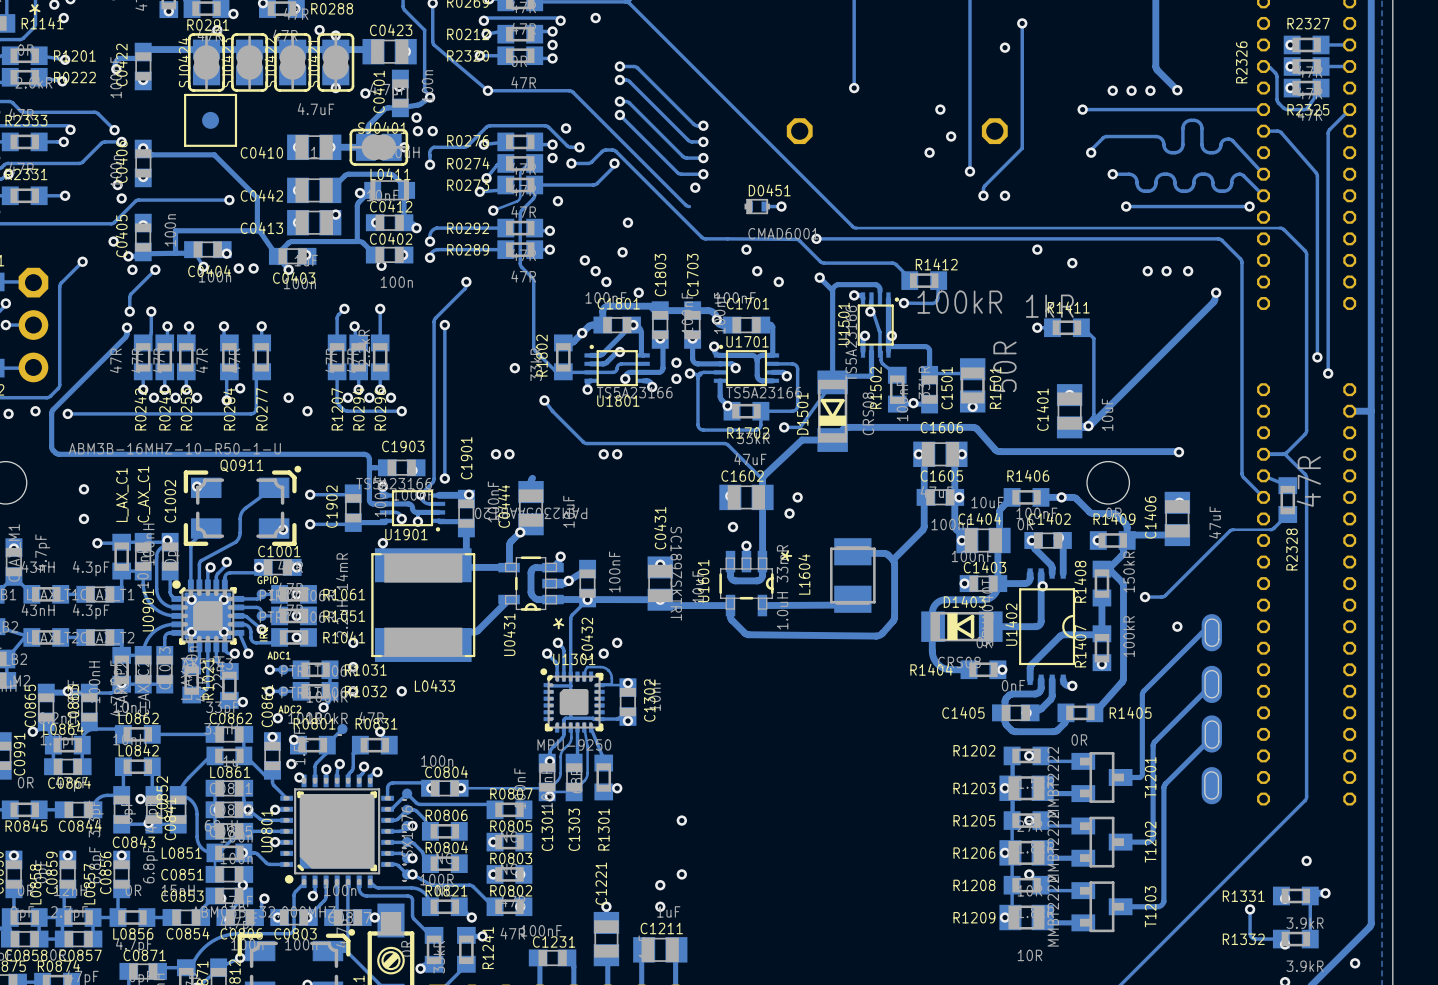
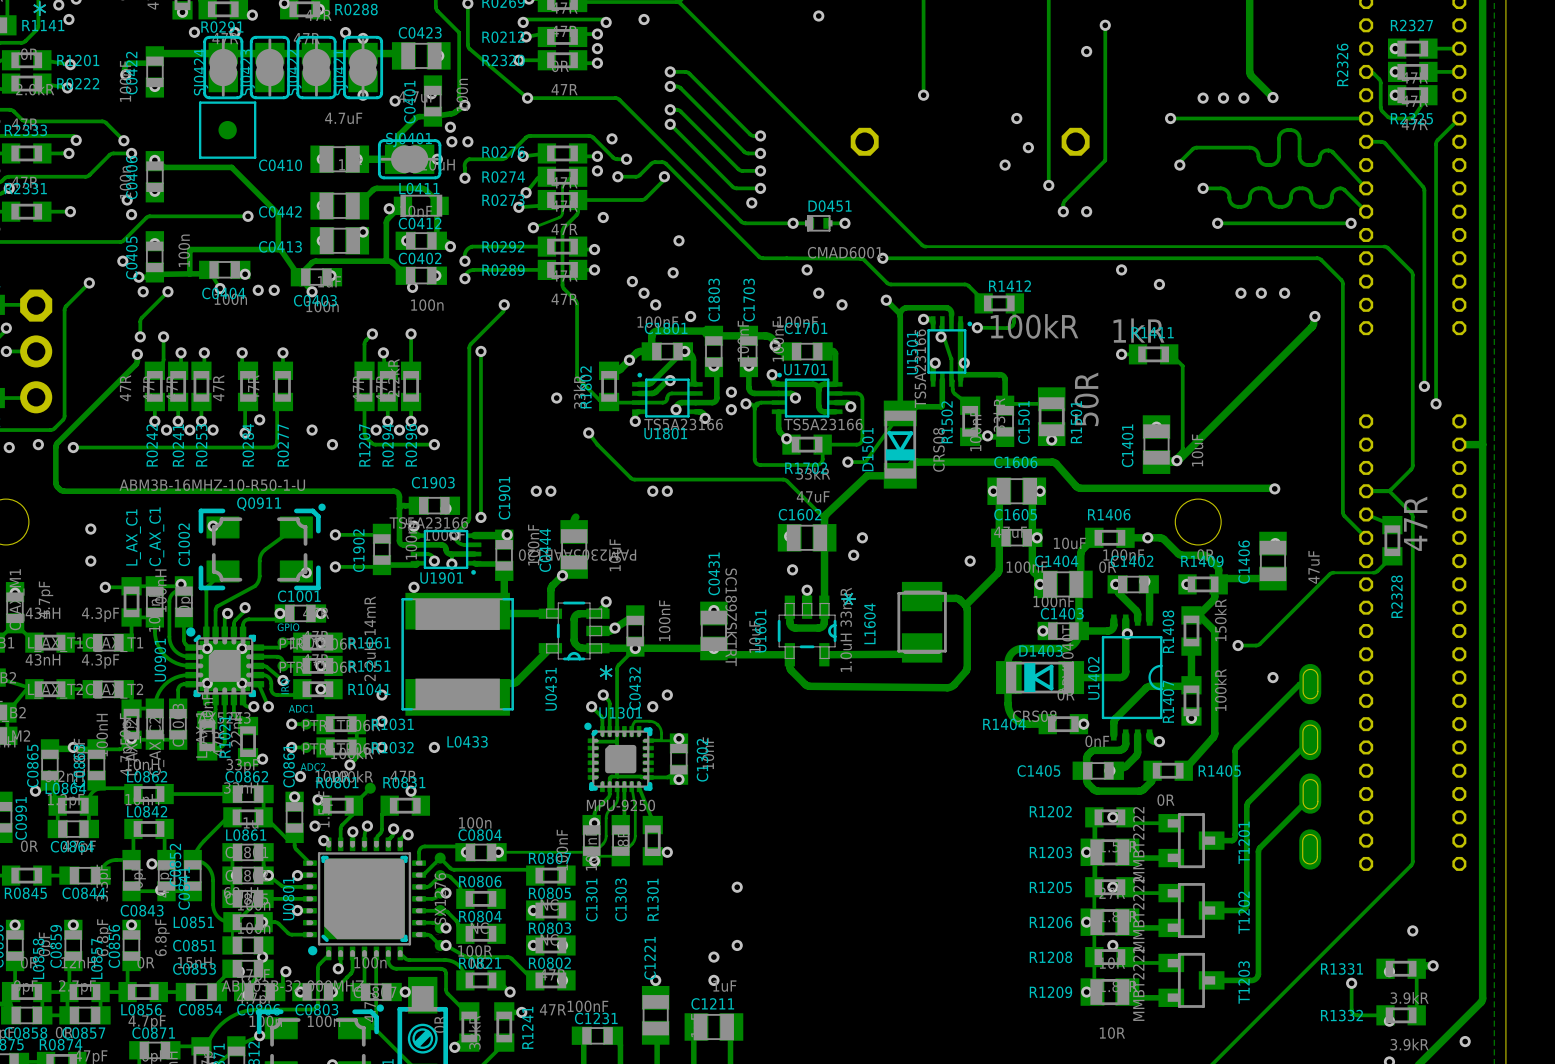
via: none -> (818, 16)
via: none -> (194, 32)
via: none -> (793, 223)
track: none -> (810, 223) (745, 223)
via: none -> (970, 561)

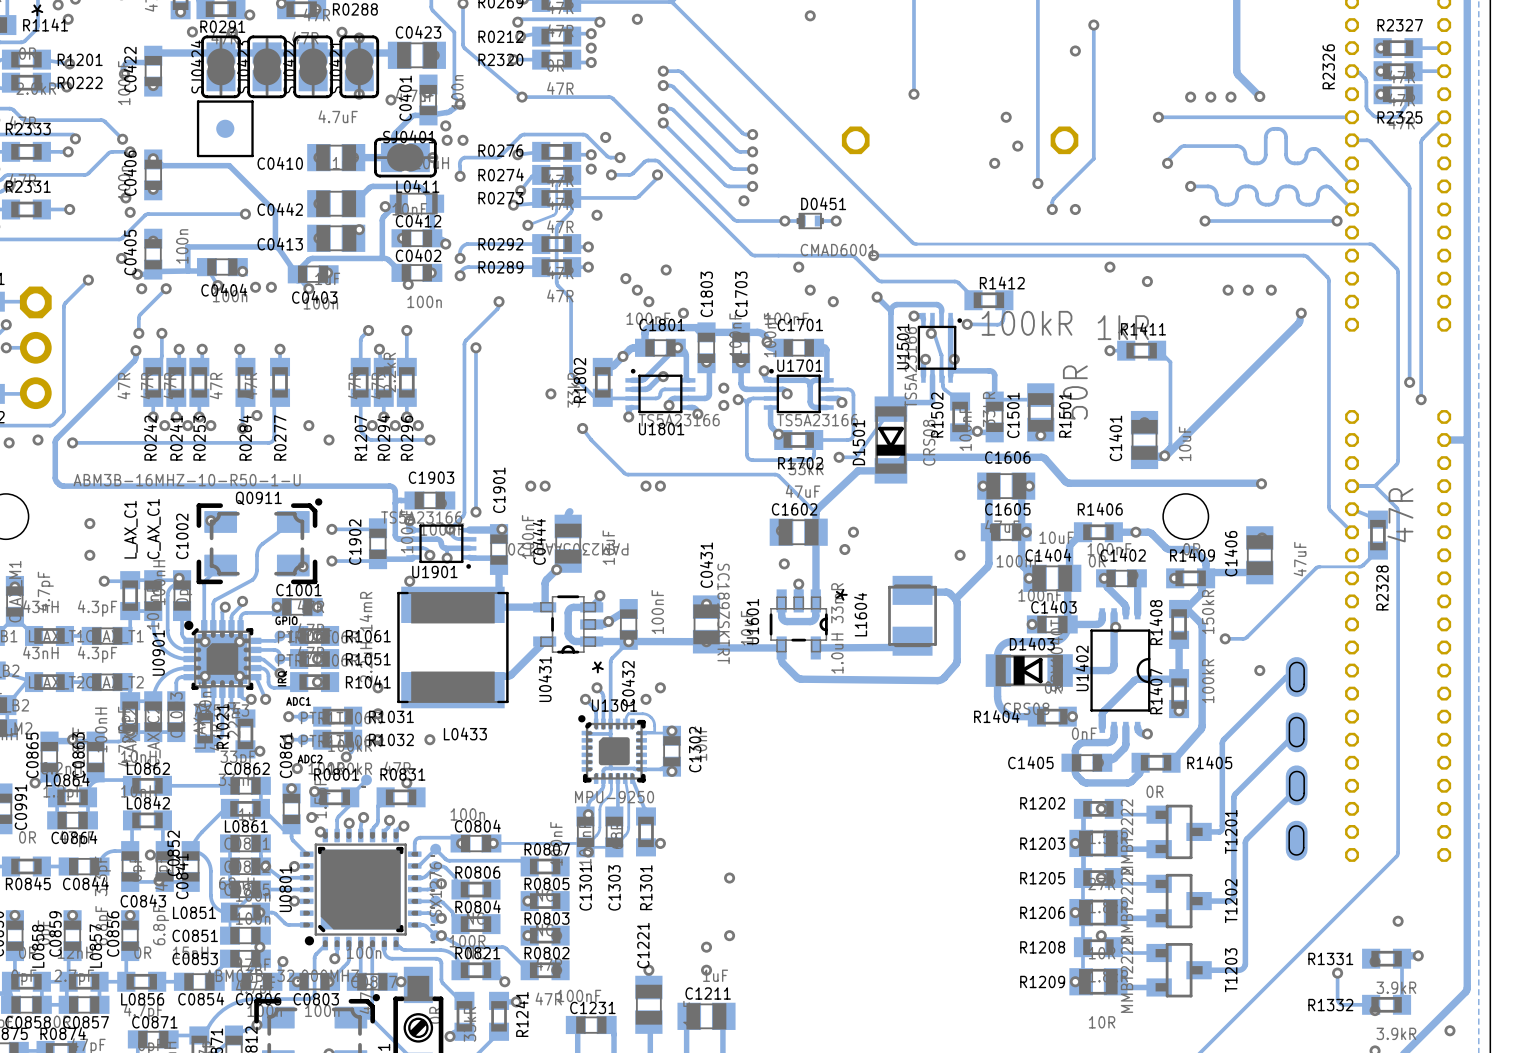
via: (678, 240) -> none

